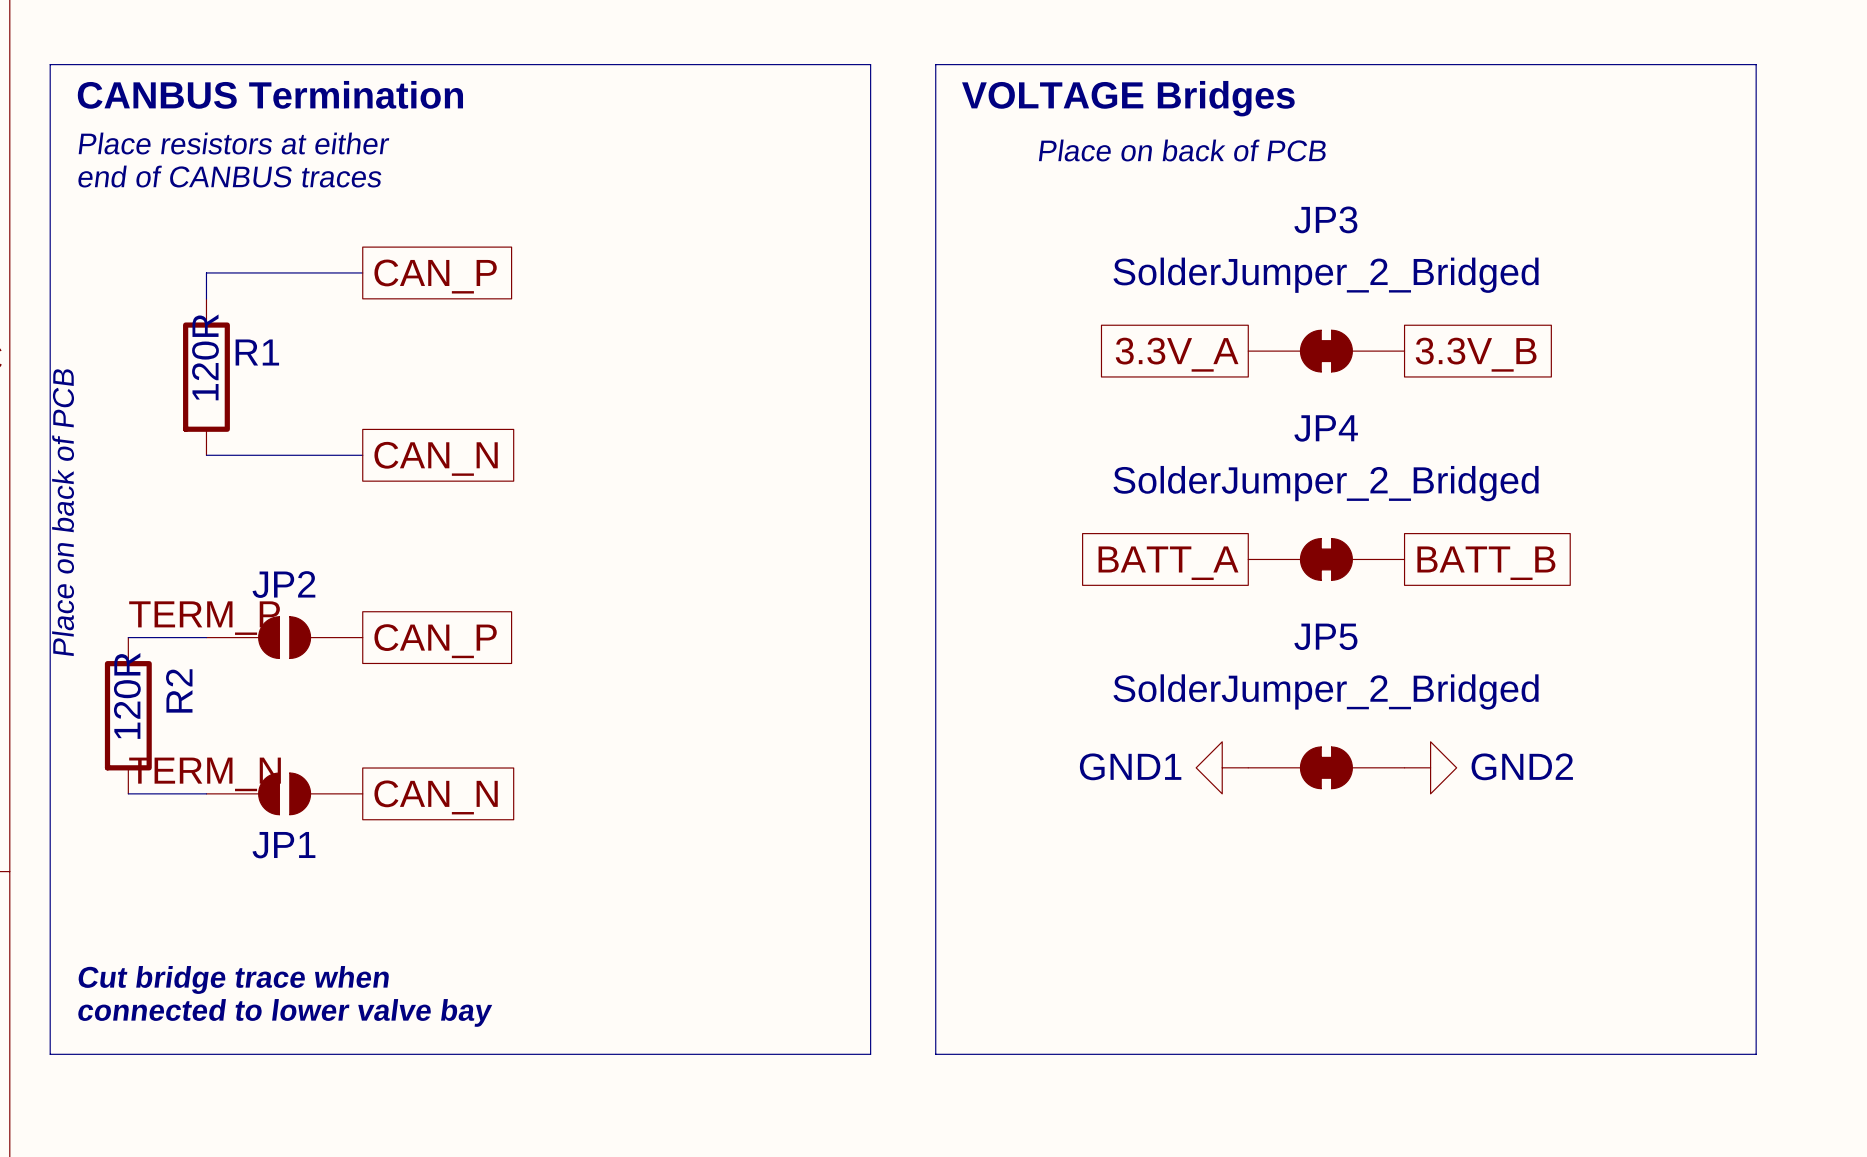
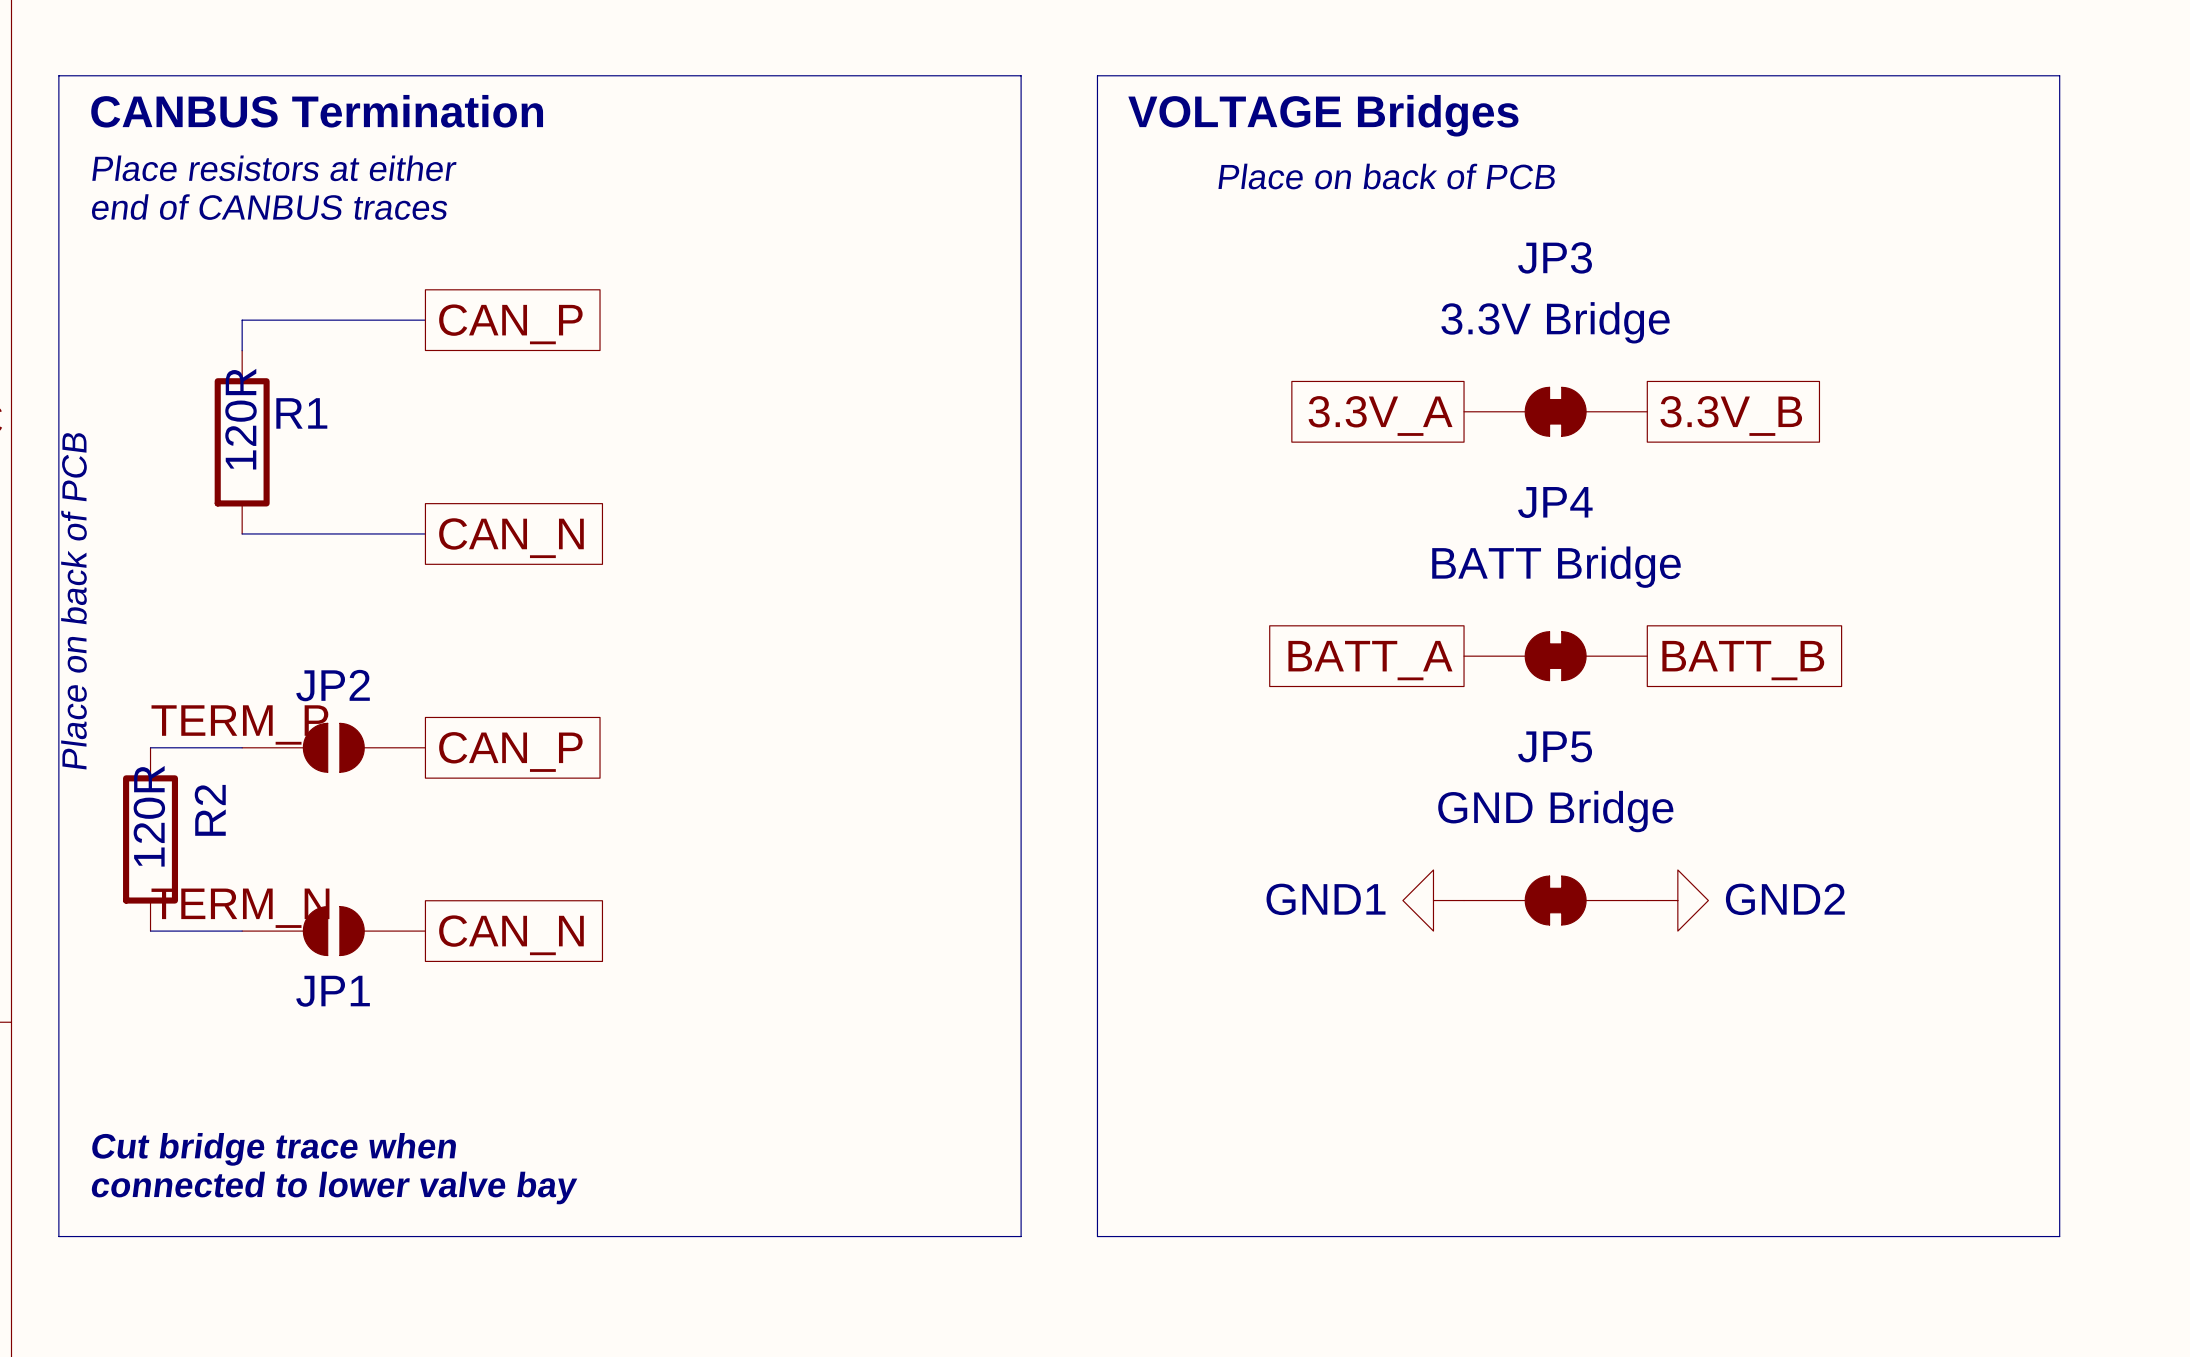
JP3 value: SolderJumper_2_Bridged (1326, 275) -> 3.3V Bridge (1555, 322)
JP4 value: SolderJumper_2_Bridged (1326, 483) -> BATT Bridge (1556, 567)
JP5 value: SolderJumper_2_Bridged (1326, 691) -> GND Bridge (1555, 811)

